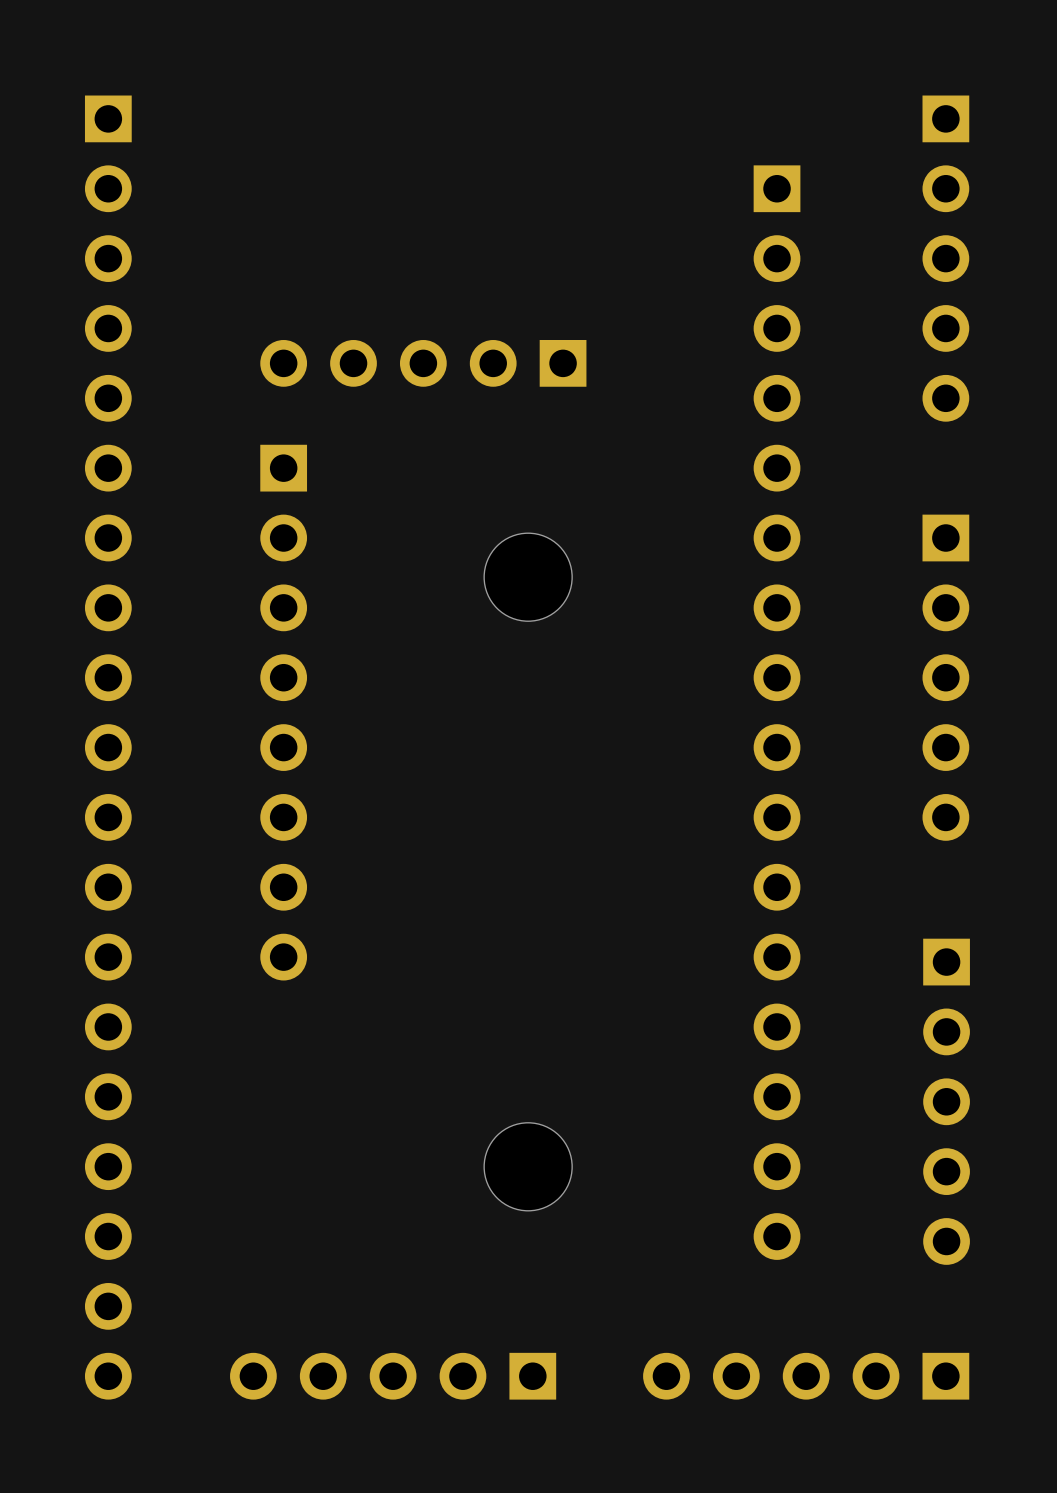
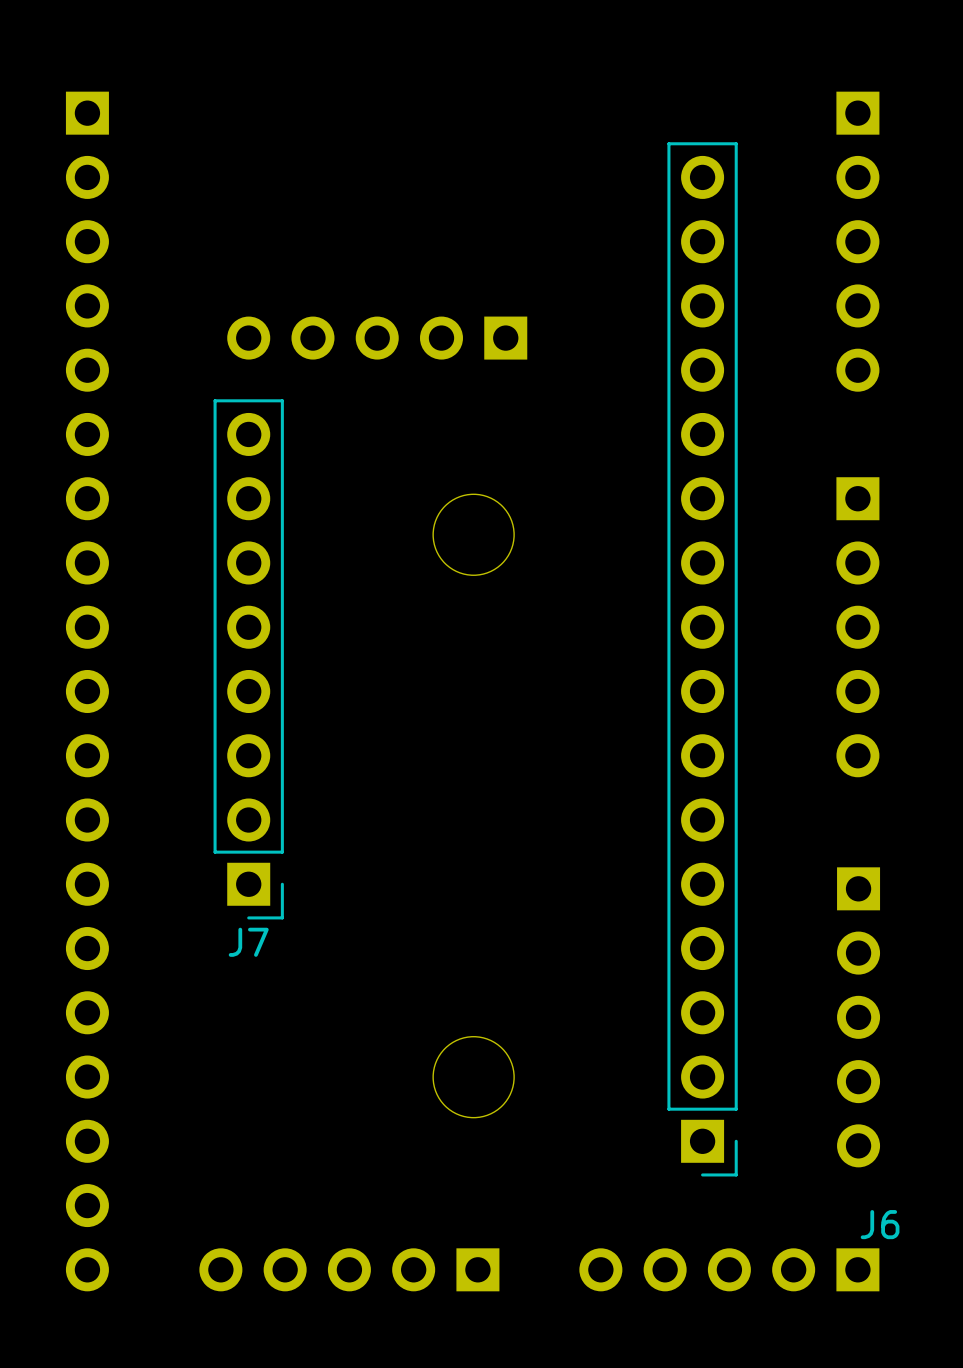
J7 side: top (283, 712) -> bottom (248, 659)
J6 side: top (777, 712) -> bottom (702, 659)

